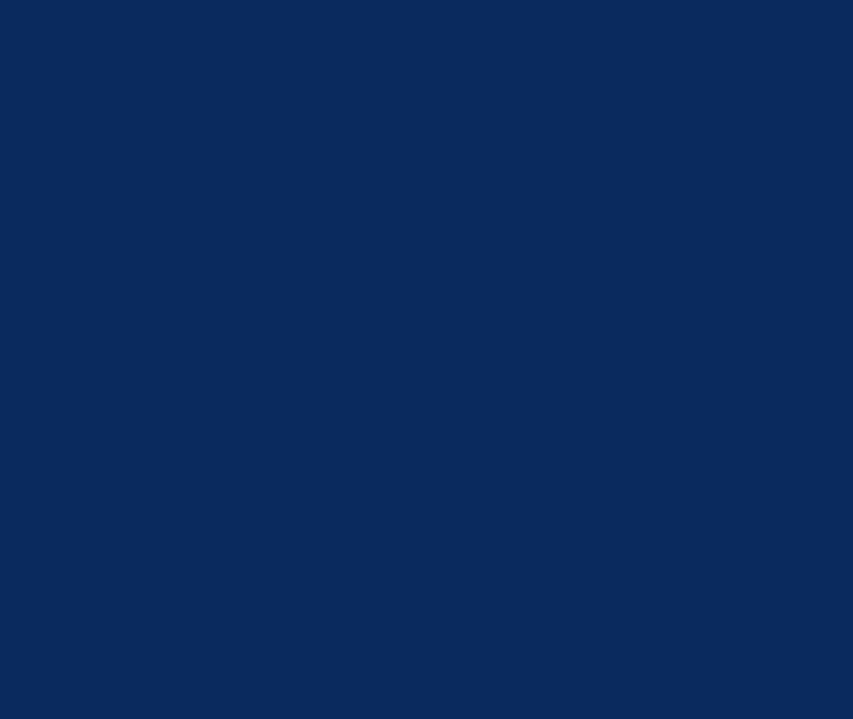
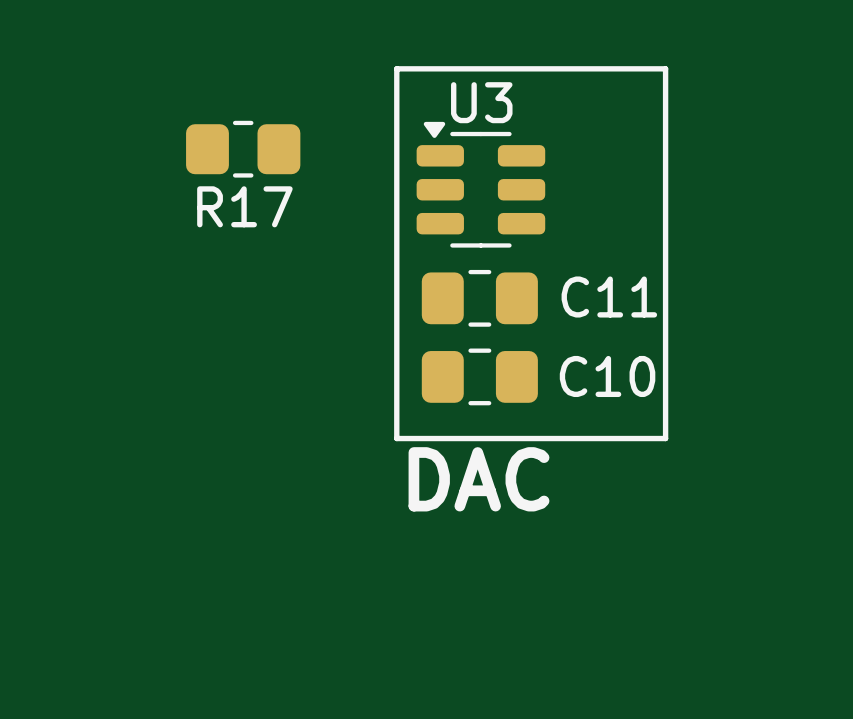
line: none -> (396, 68) (665, 68) (665, 438) (396, 438) (396, 68)
R17: none -> (243, 149)
U3: none -> (480, 184)
C11: none -> (479, 298)
C10: none -> (479, 376)
text: none -> DAC (478, 479)

